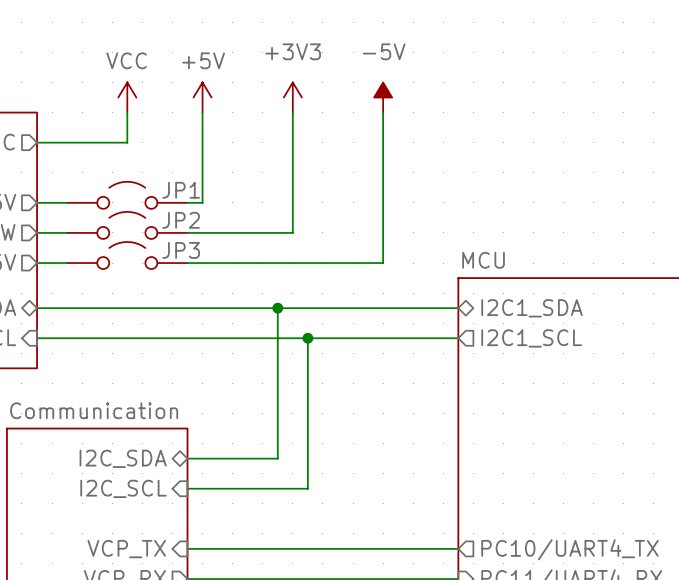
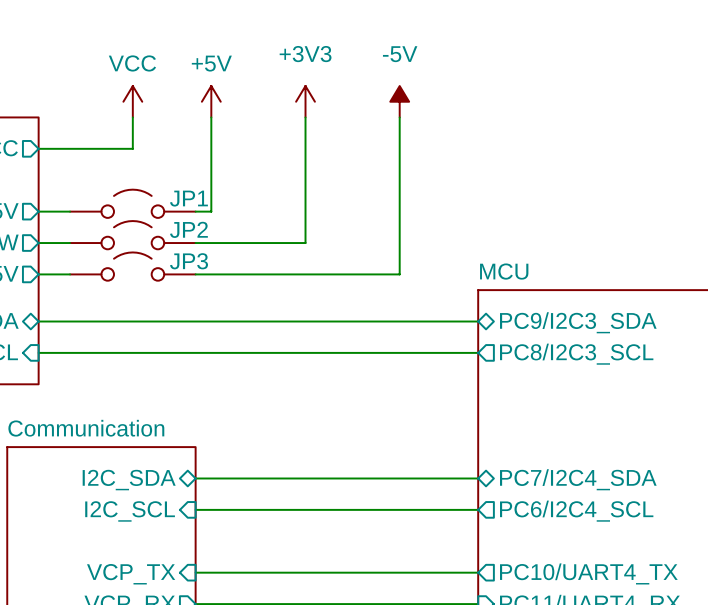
wire: (277, 308) (277, 458) -> (478, 478) (289, 478)
junction: (277, 308) -> none
sheet pin: I2C1_SDA (532, 308) -> PC9/I2C3_SDA (578, 322)
wire: (307, 338) (307, 488) -> (478, 509) (321, 509)
junction: (307, 338) -> none
sheet pin: I2C1_SCL (531, 338) -> PC8/I2C3_SCL (576, 354)
sheet pin: none -> PC7/I2C4_SDA (578, 479)
sheet pin: none -> PC6/I2C4_SCL (576, 511)

